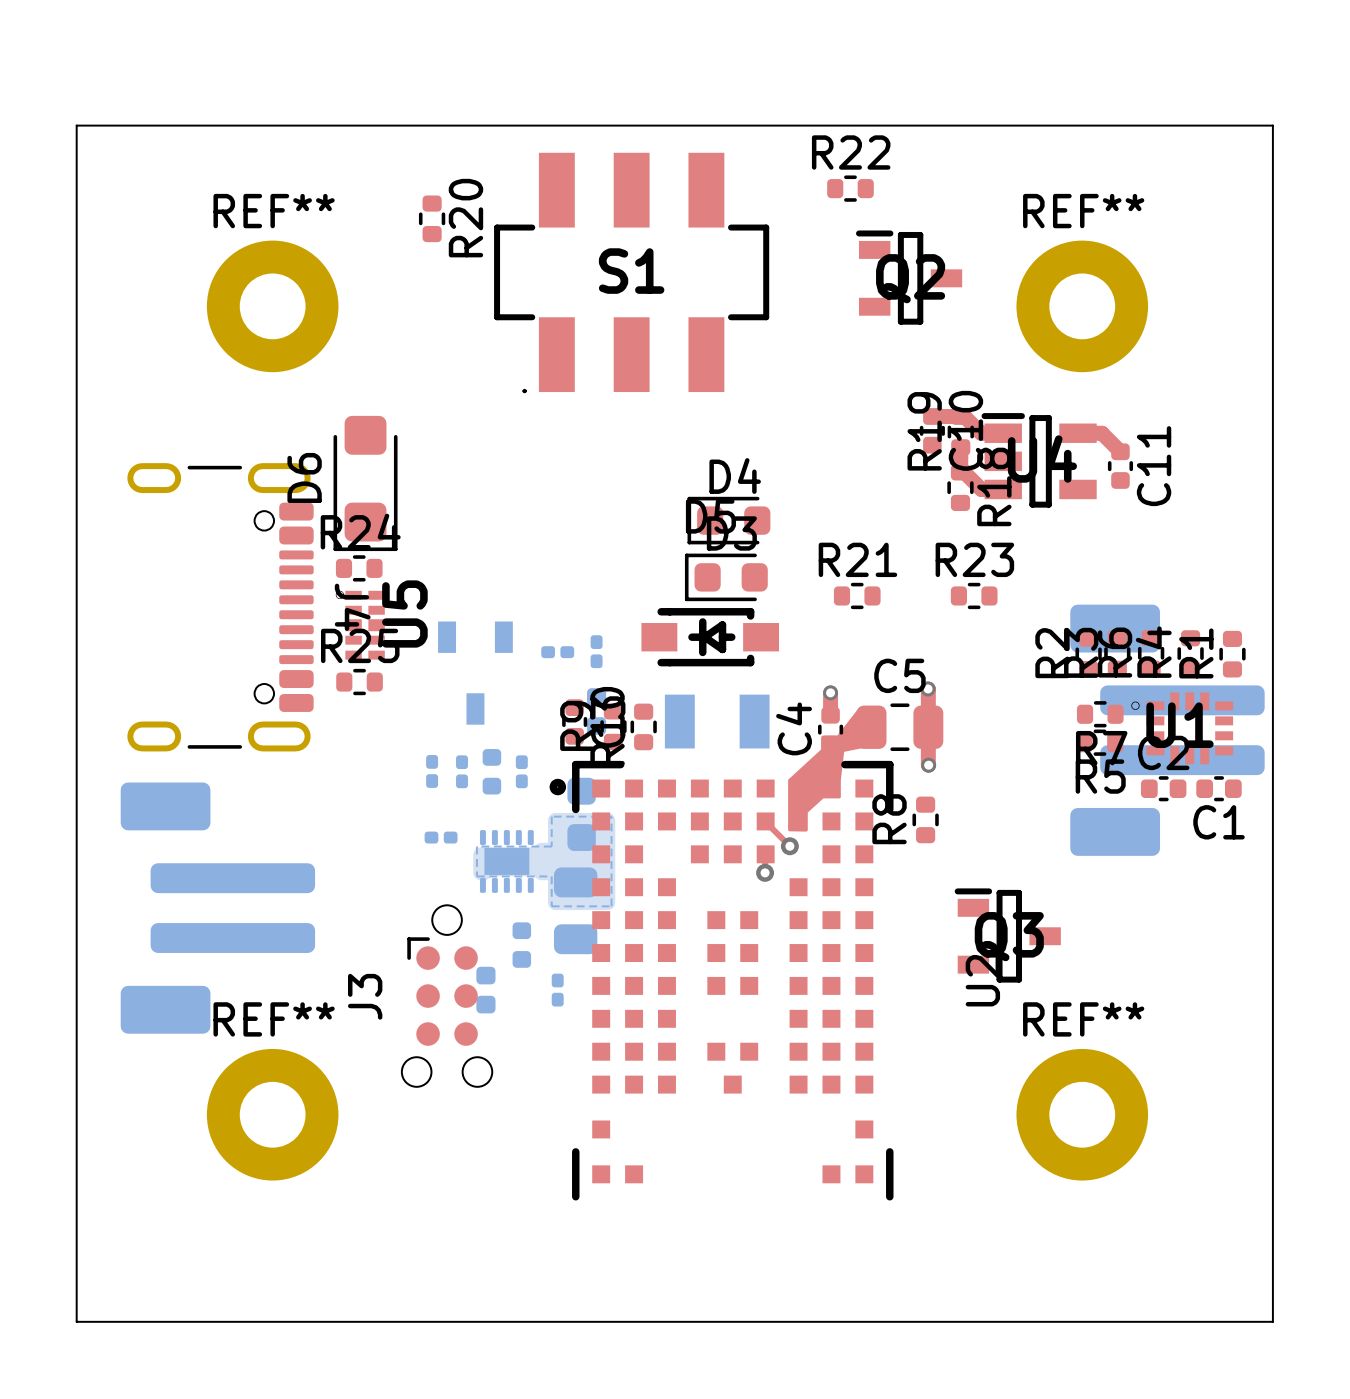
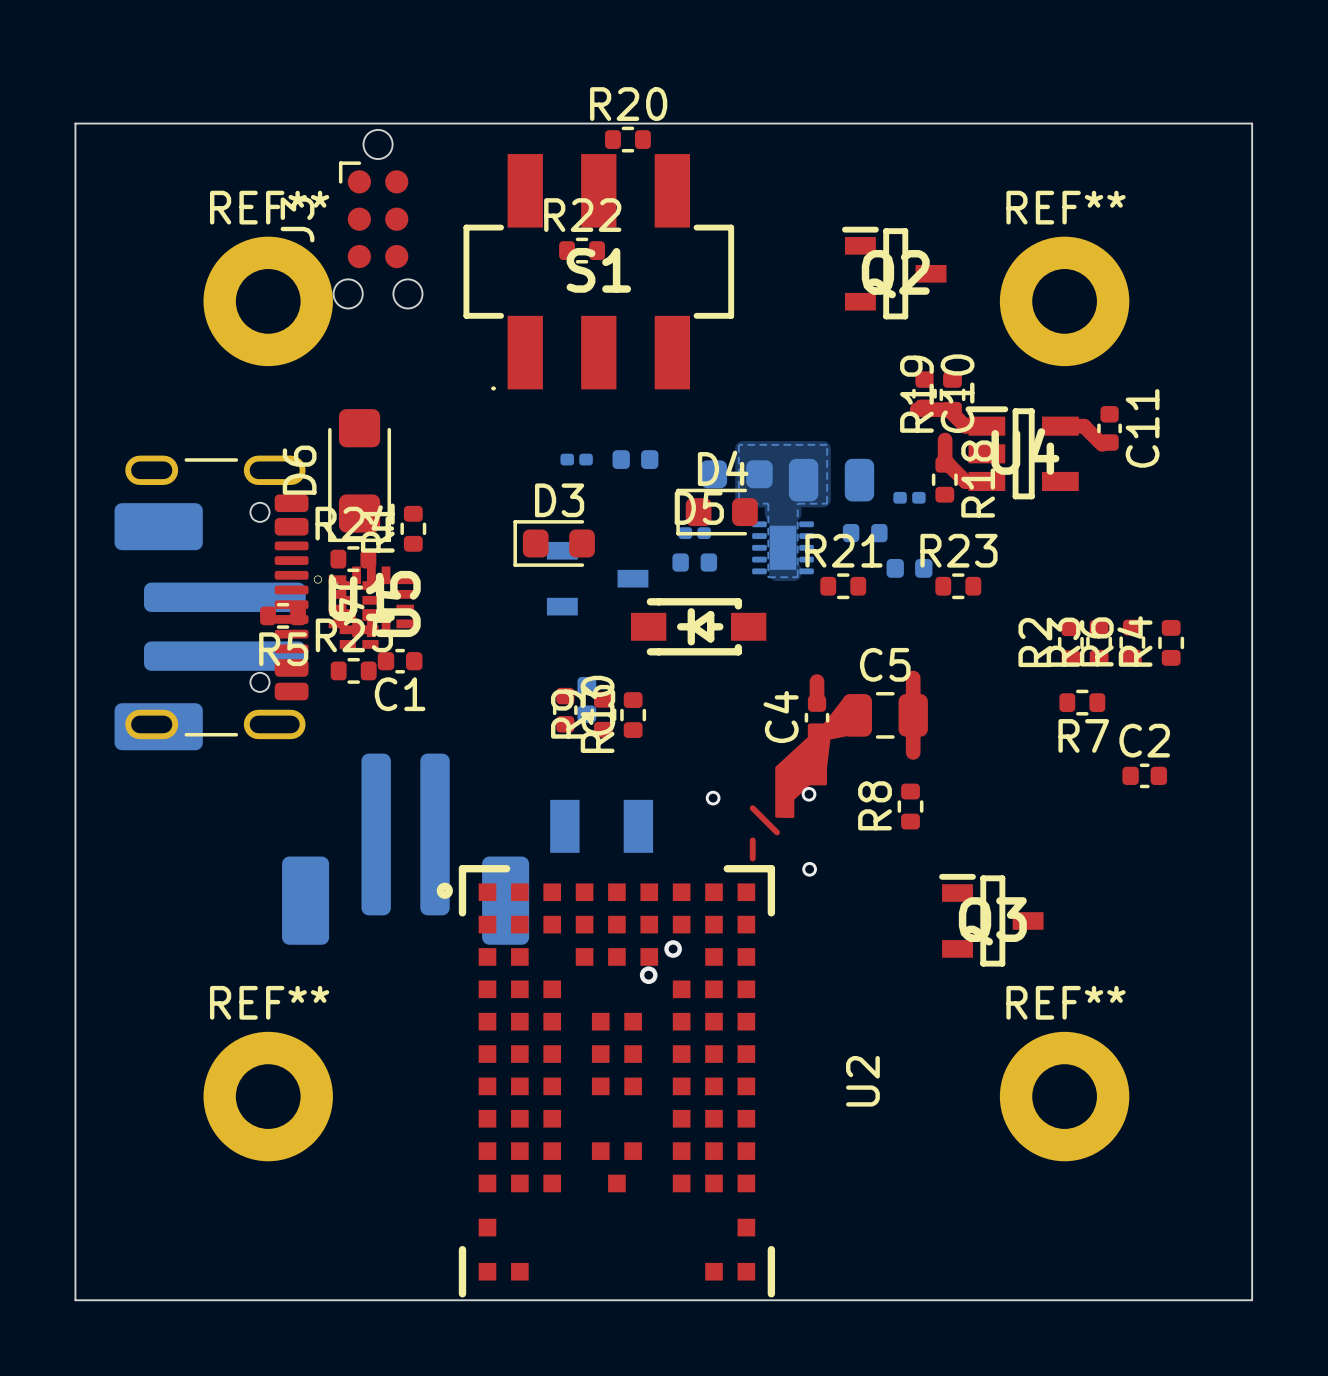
R22 position: (850, 188) -> (582, 250)
R20 rotation: 0° (432, 218) -> 90° clockwise (627, 139)
R20 position: (432, 218) -> (627, 139)
S1 position: (631, 273) -> (598, 272)
C10 position: (932, 430) -> (924, 393)
R19 position: (960, 432) -> (952, 394)
bottom zone outline: none -> (738, 444) (827, 444) (827, 503) (797, 503) (797, 577) (768, 577) (768, 503) (738, 503) (738, 444)
C11 position: (1120, 466) -> (1109, 428)
part: none -> (576, 459)
part: none -> (635, 459)
part: none -> (909, 497)
part: none -> (694, 533)
part: none -> (865, 533)
part: none -> (694, 562)
D3 position: (726, 577) -> (554, 543)
part: none -> (909, 568)
part: none -> (210, 626)
part: (596, 651) -> none
part: (557, 652) -> none
R1 position: (1232, 654) -> (413, 528)
part rotation: 0° (475, 673) -> 90° counterclockwise (597, 578)
part position: (475, 673) -> (597, 578)
via: (928, 688) -> none
via: (830, 692) -> none
part position: (717, 721) -> (601, 826)
U1 position: (1182, 728) -> (363, 601)
part: (1167, 730) -> none
R5 position: (1099, 742) -> (283, 615)
via: (928, 765) -> none
part: (432, 771) -> none
part: (462, 771) -> none
part: (491, 771) -> none
part: (521, 771) -> none
C1 position: (1219, 788) -> (400, 661)
via: none -> (809, 794)
via: none -> (713, 798)
part rotation: 0° (581, 814) -> 90° clockwise (736, 474)
part position: (581, 814) -> (736, 474)
bottom zone outline: (551, 816) (611, 816) (611, 906) (551, 906) (551, 876) (476, 876) (476, 846) (551, 846) (551, 816) -> none
part: (441, 837) -> none
via: (789, 846) -> none
part rotation: 0° (506, 861) -> 90° clockwise (783, 547)
part position: (506, 861) -> (783, 547)
part: none -> (405, 849)
via: (765, 872) -> none
via: none -> (809, 869)
part: (217, 908) -> none
part rotation: 0° (575, 910) -> 90° clockwise (831, 480)
part position: (575, 910) -> (831, 480)
part: (521, 945) -> none
via: none -> (673, 949)
U2 position: (721, 980) -> (605, 1081)
part: (485, 990) -> none
part: (557, 990) -> none
via: none -> (648, 975)
J3 position: (447, 996) -> (378, 219)

